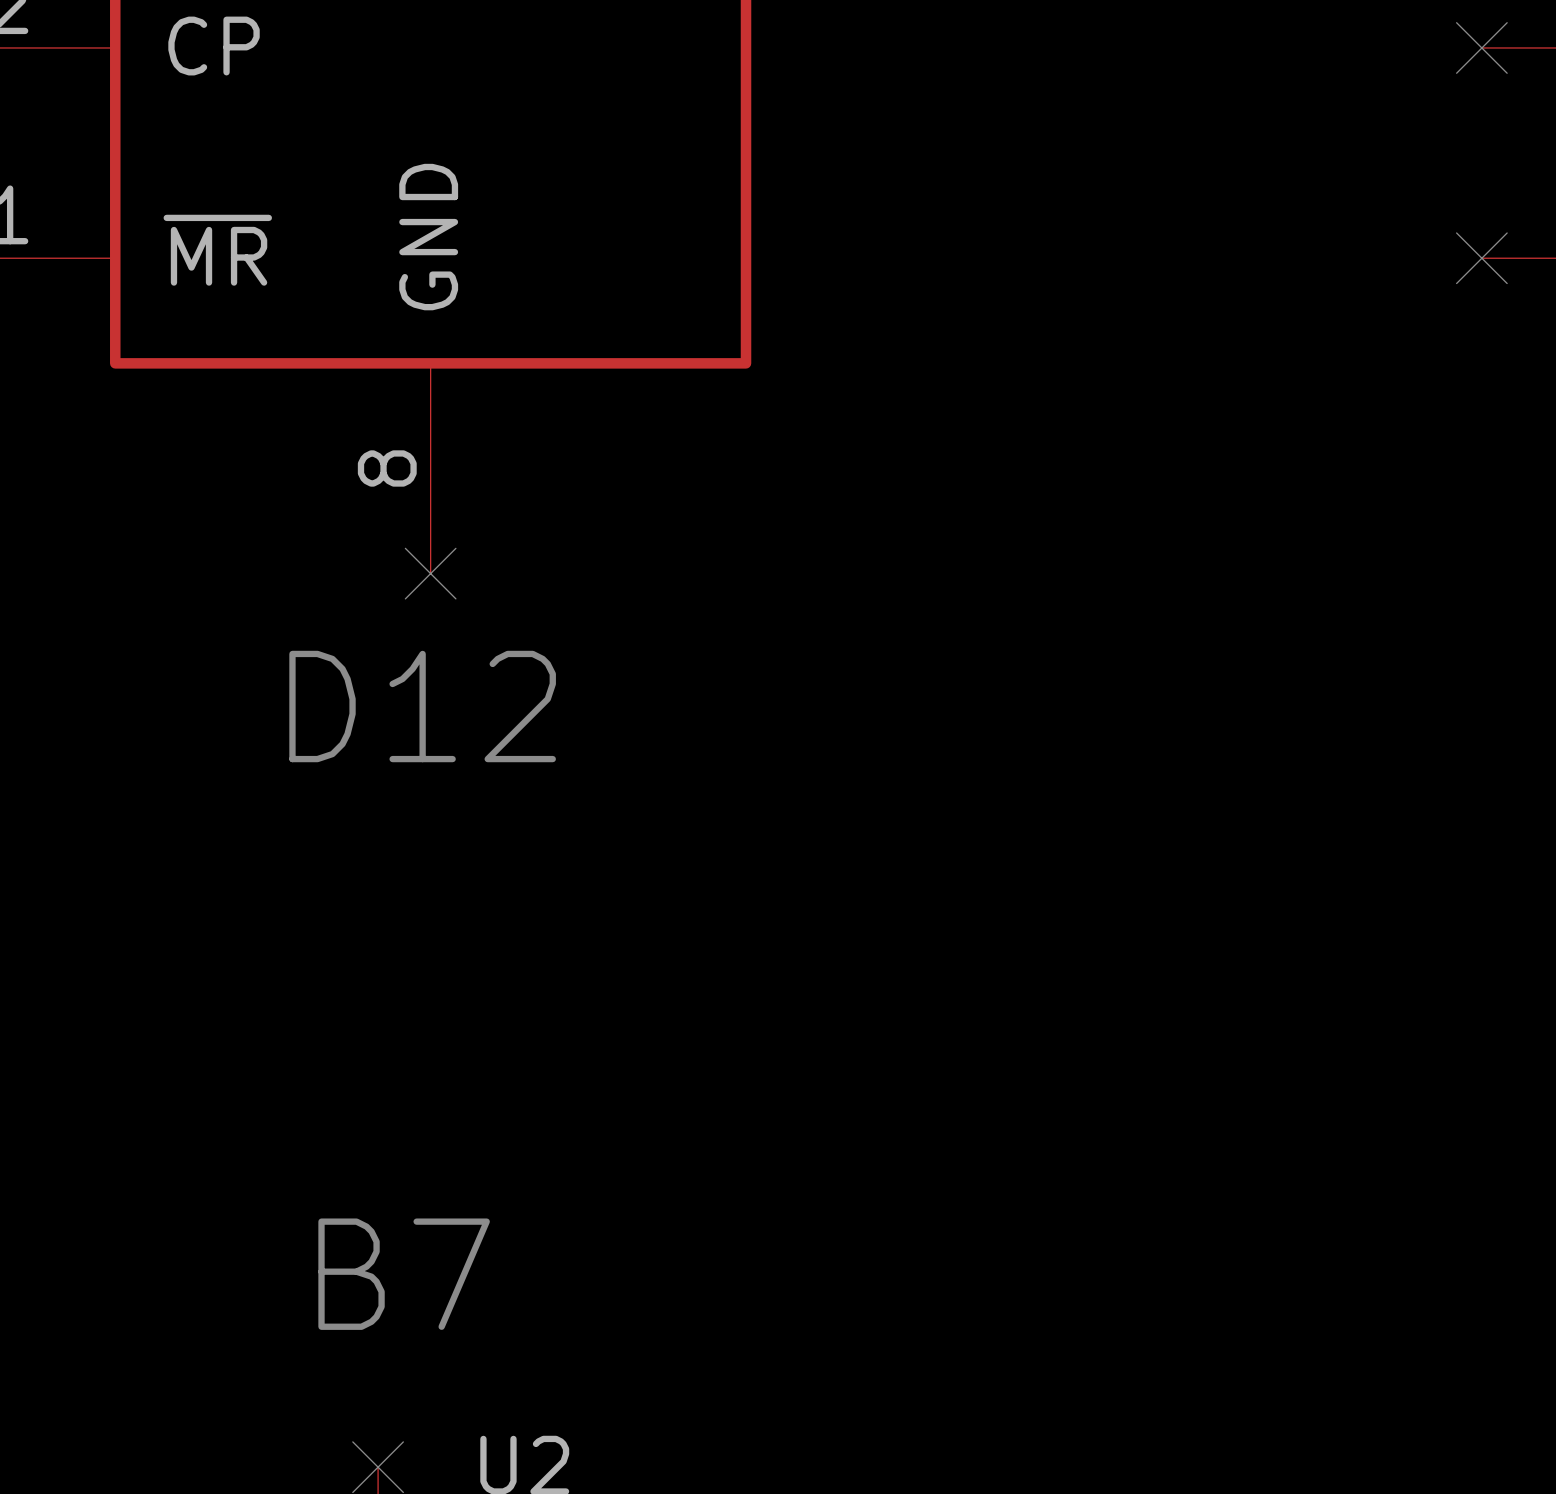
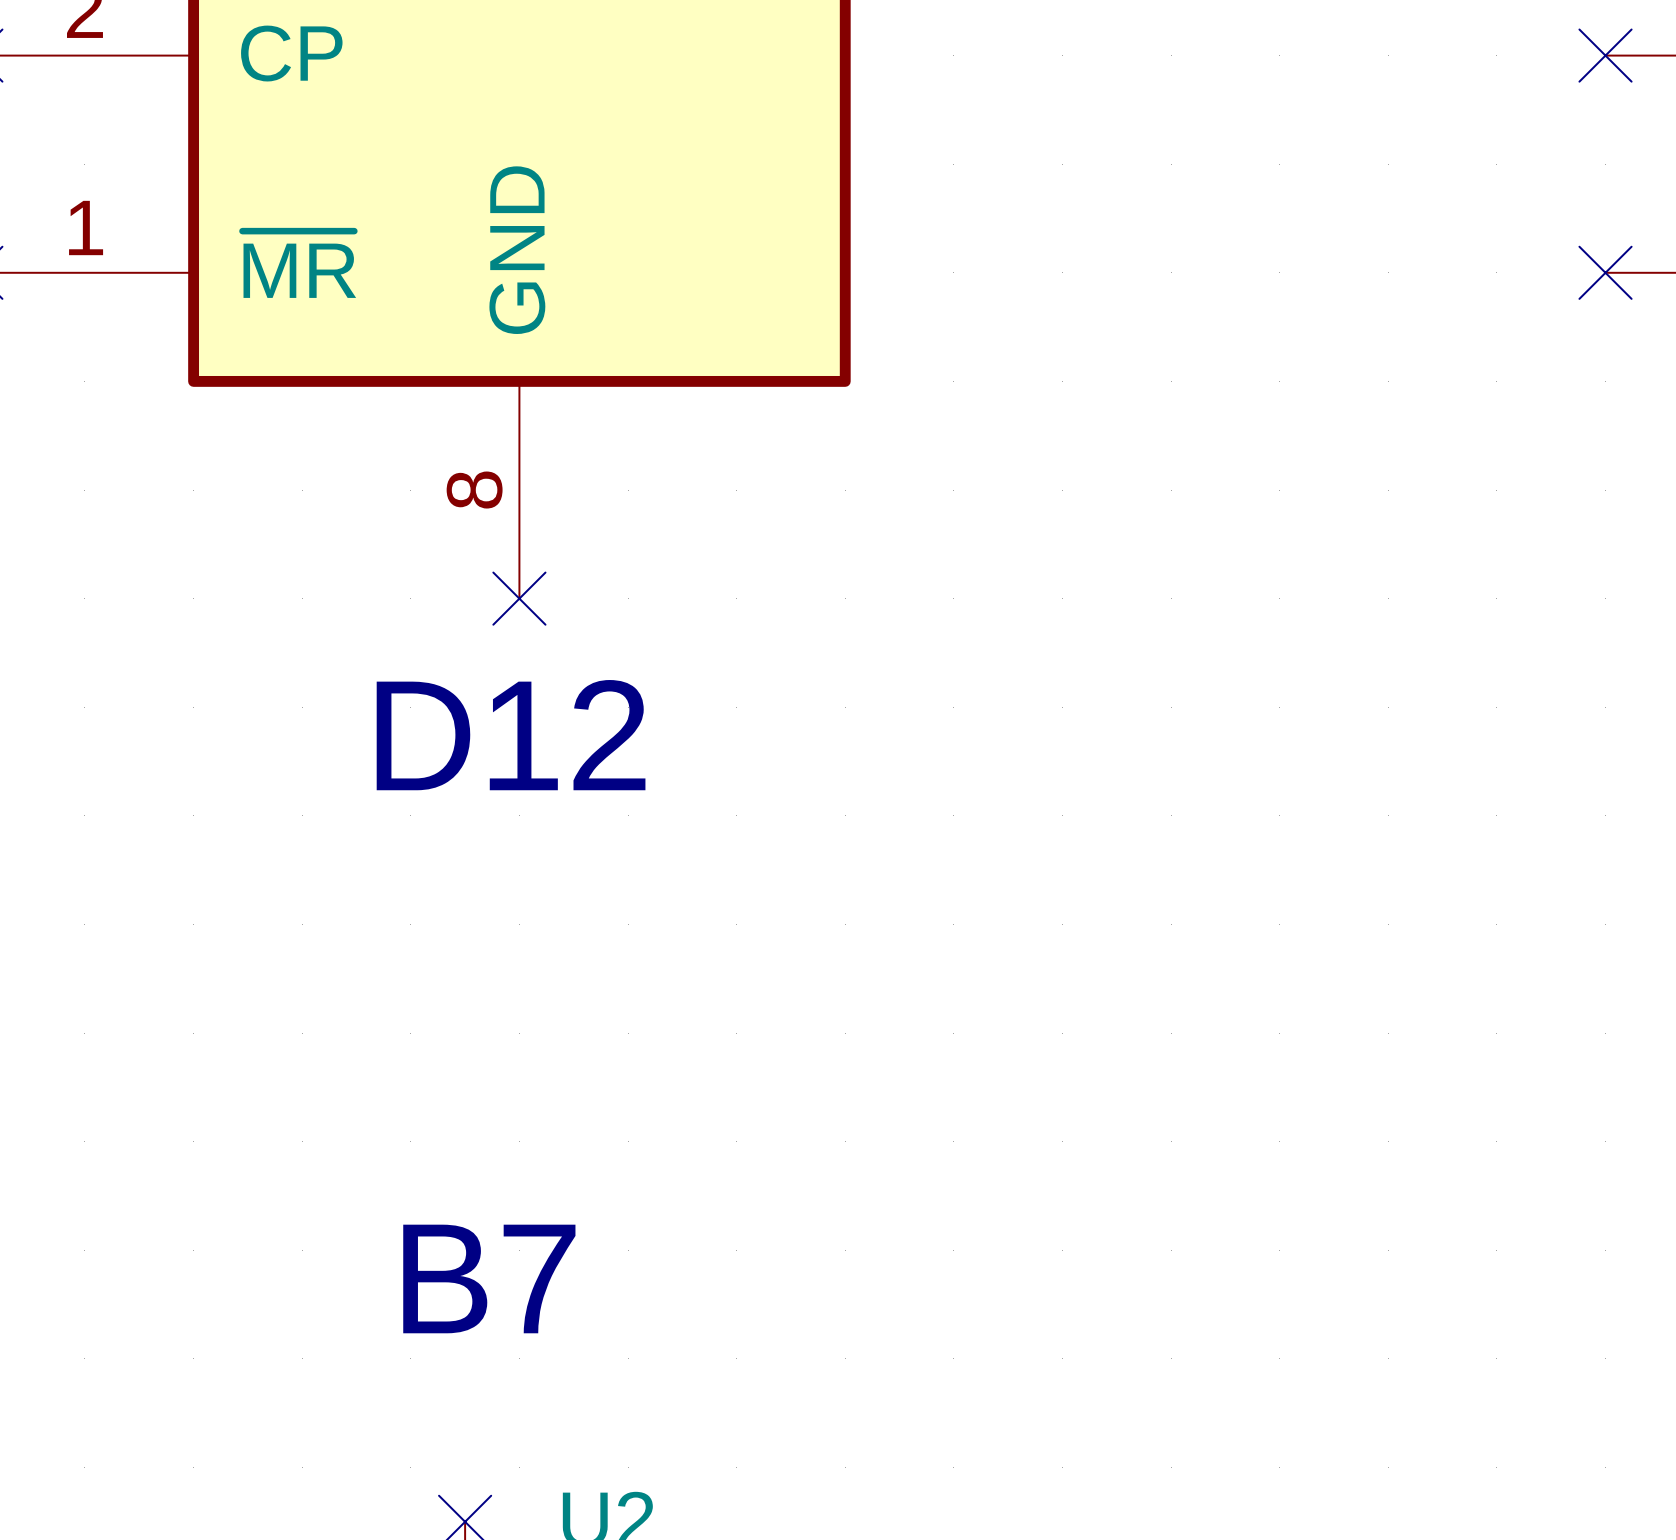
text position: B7 (404, 1274) -> B7 (489, 1278)

